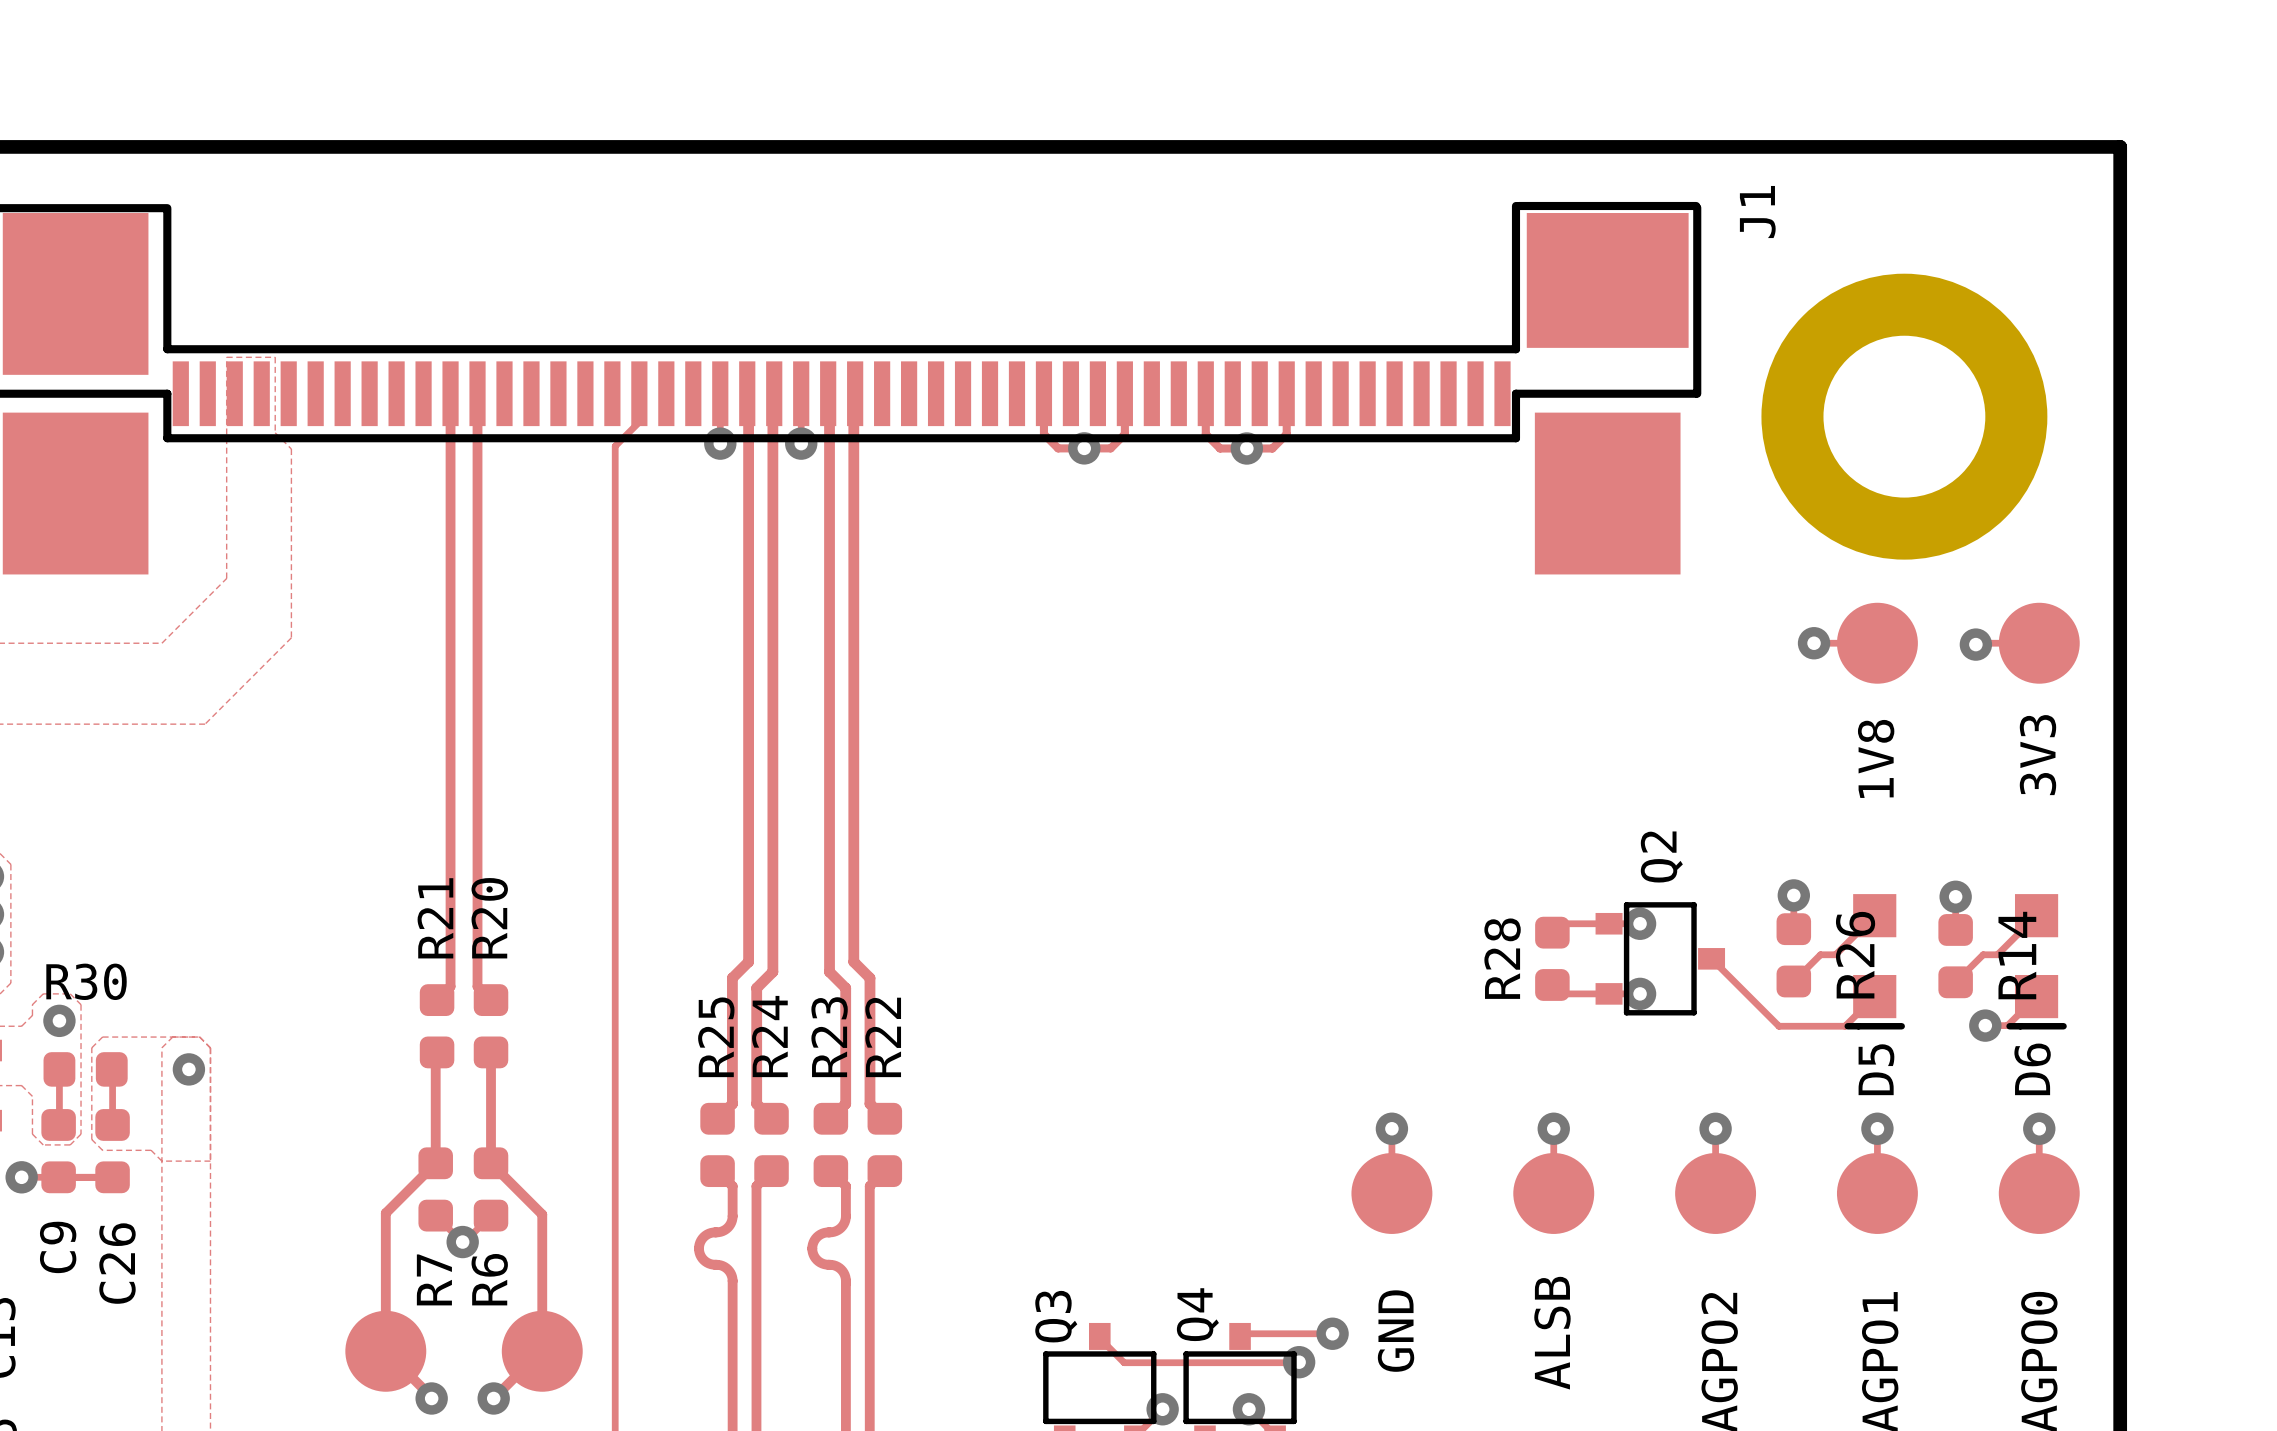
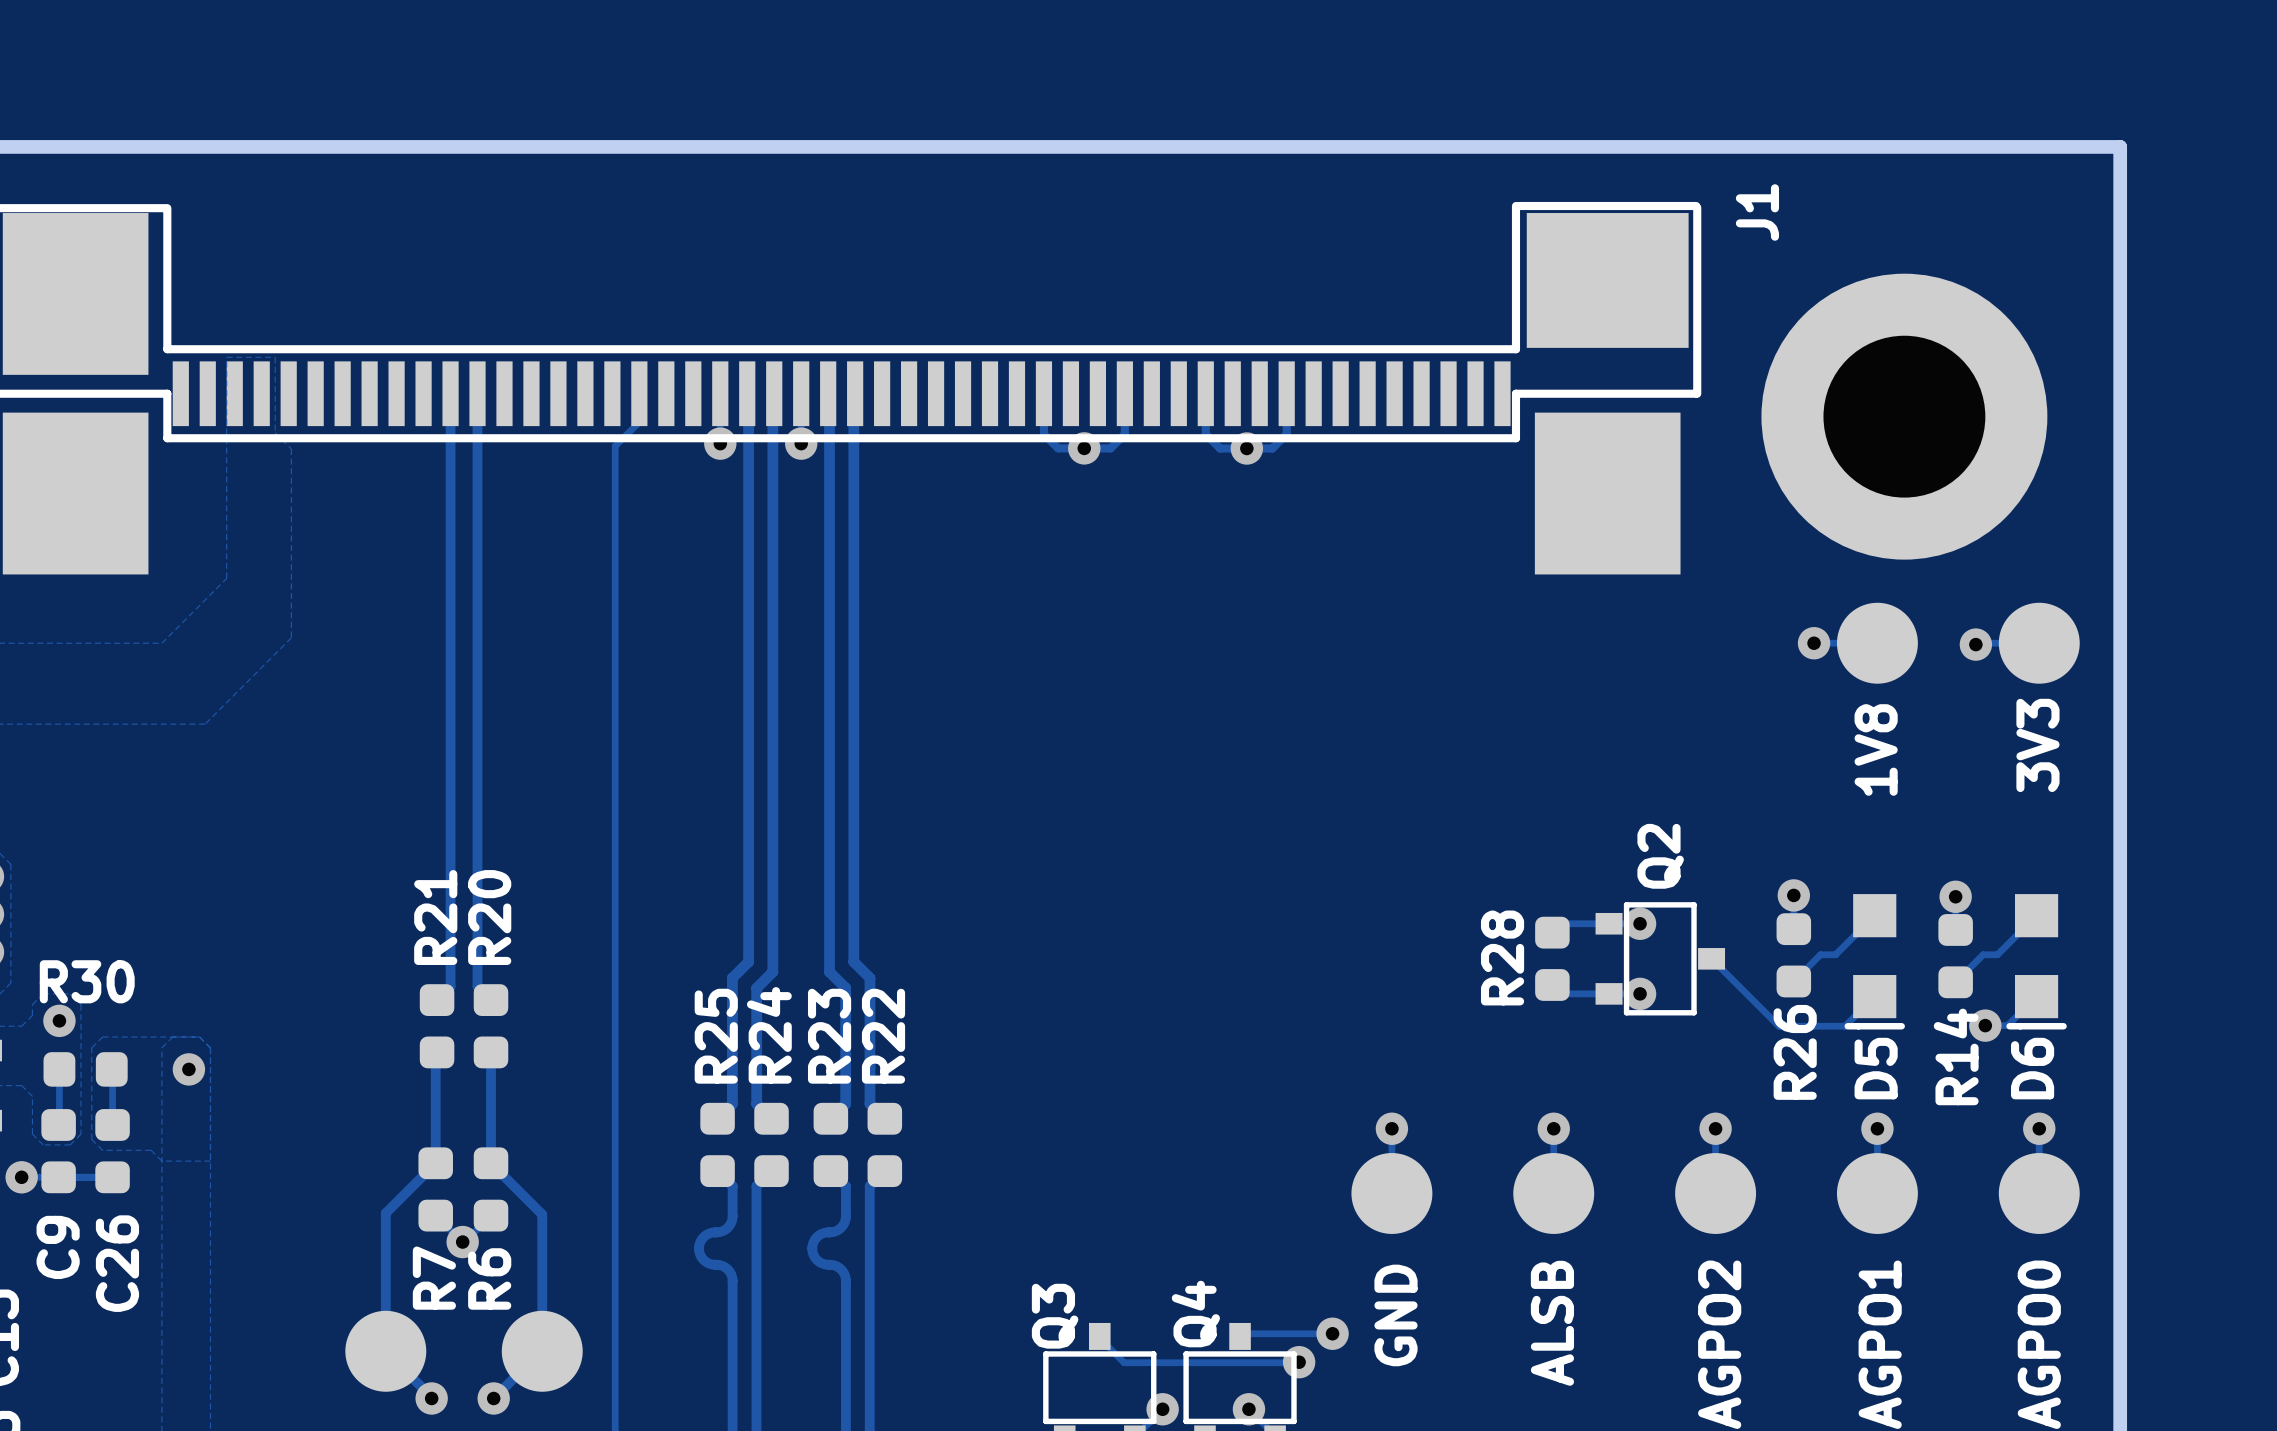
R26 name position: R26 (1855, 955) -> R26 (1795, 1052)
R14 name position: R14 (2017, 955) -> R14 (1956, 1056)

